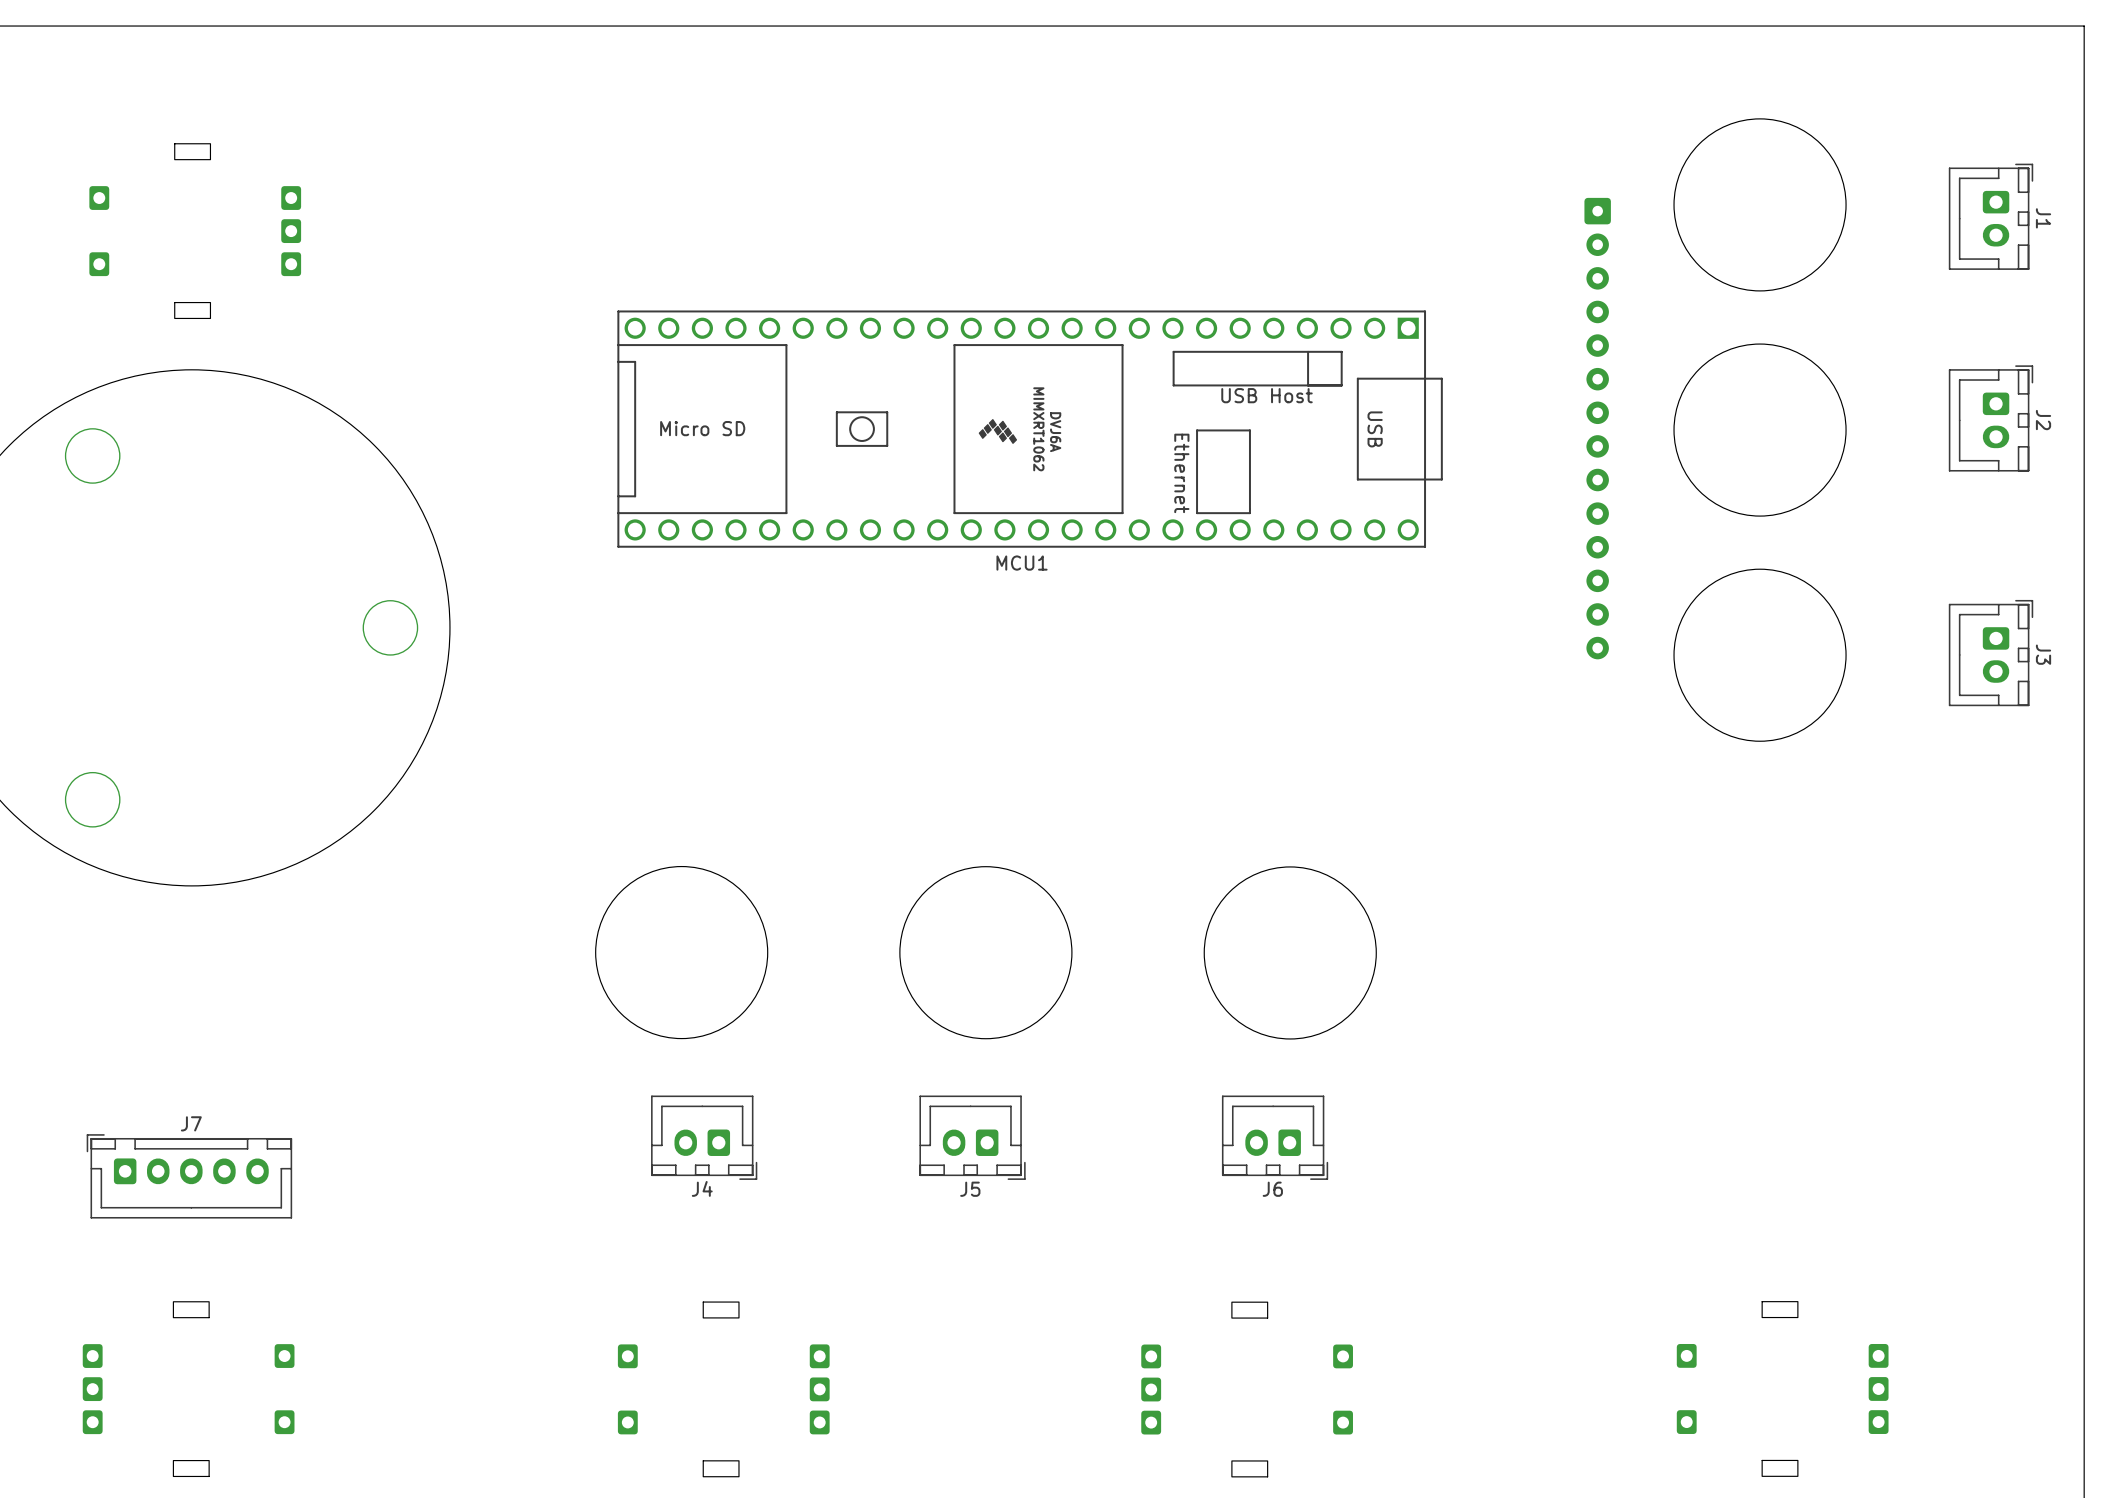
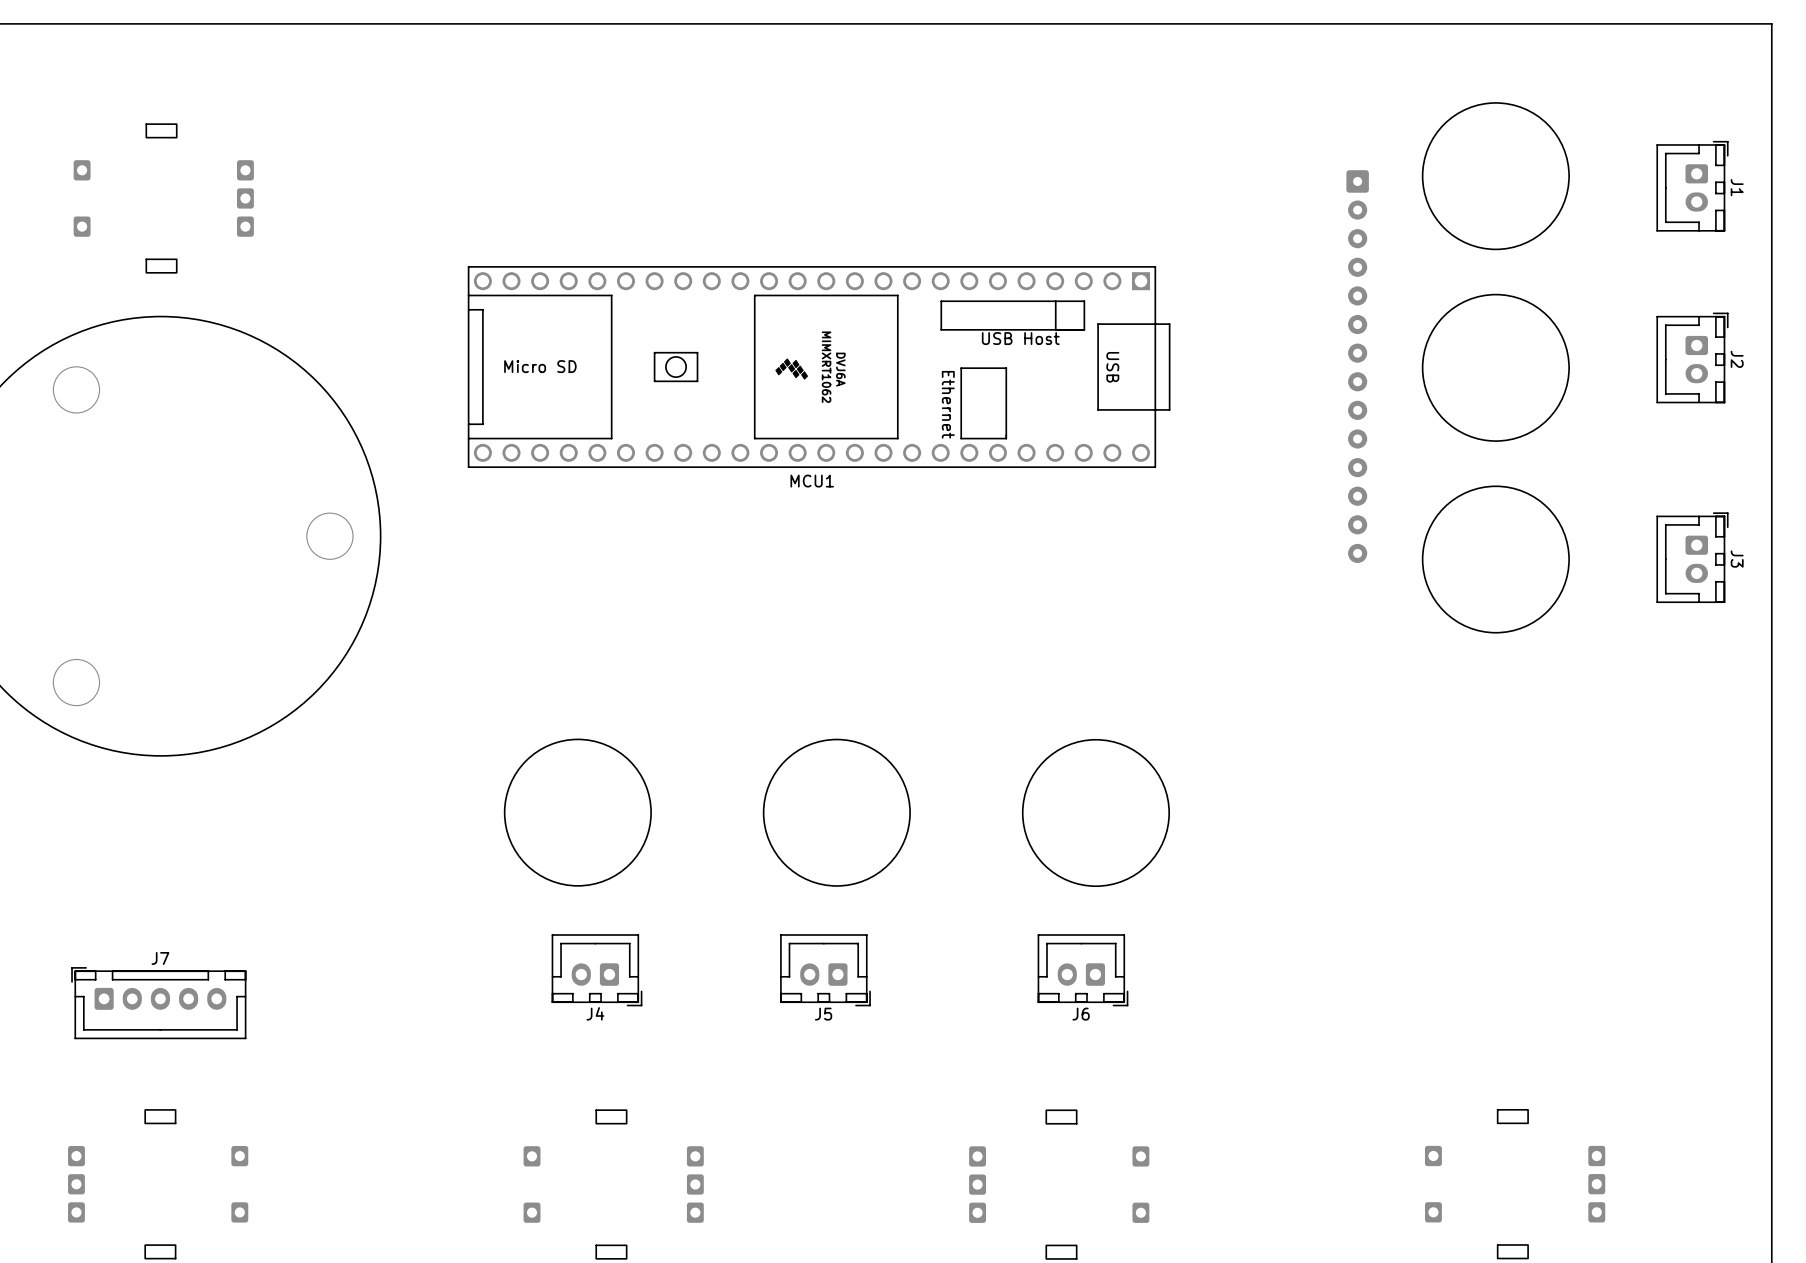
MCU1 position: (1030, 429) -> (819, 367)

